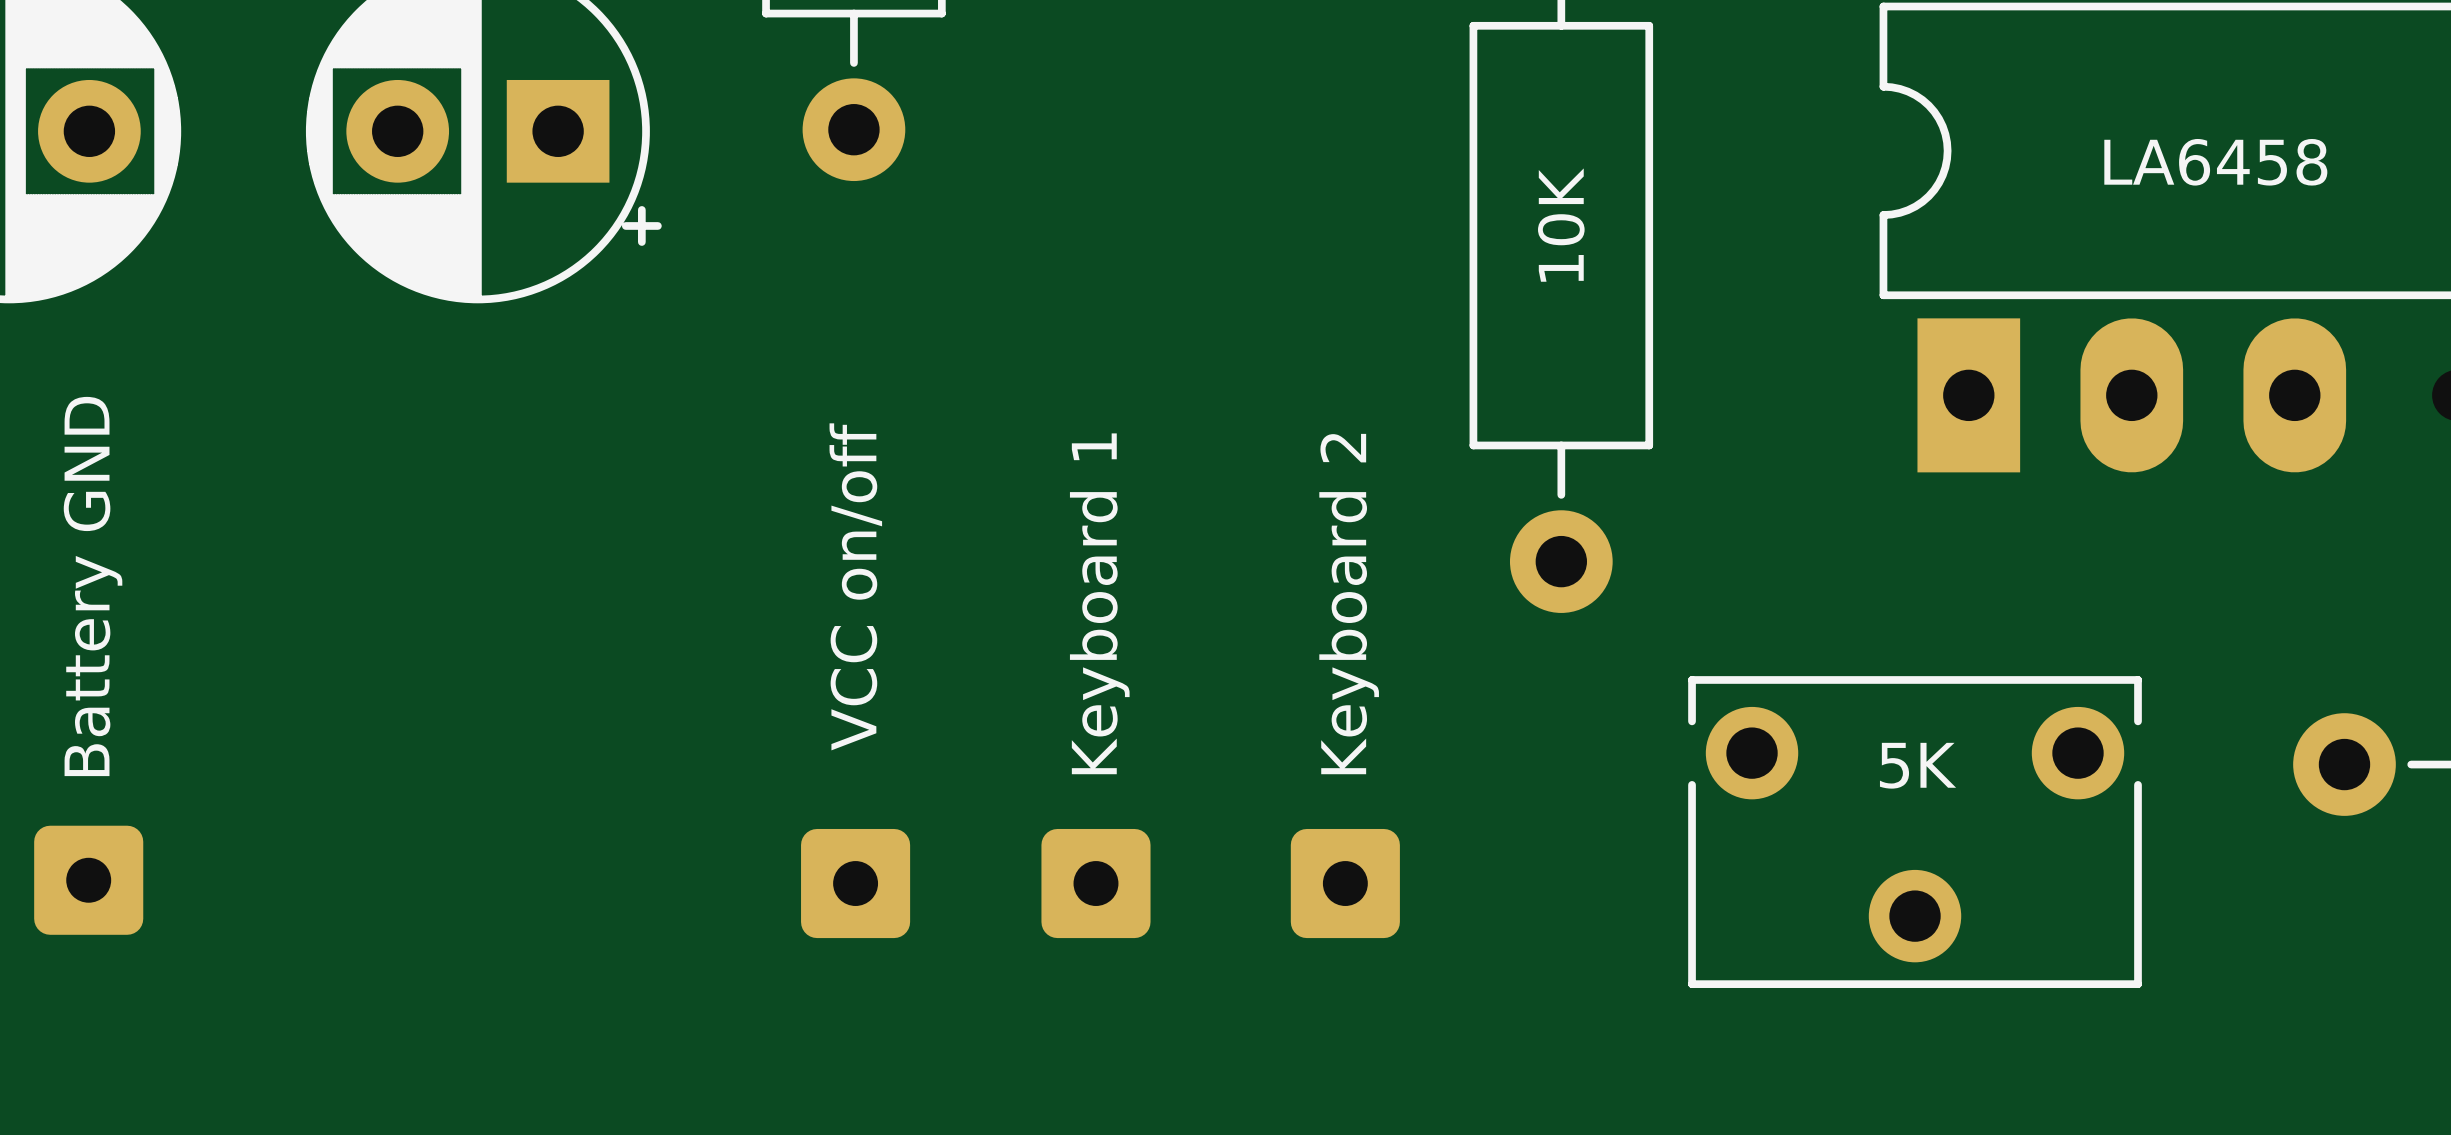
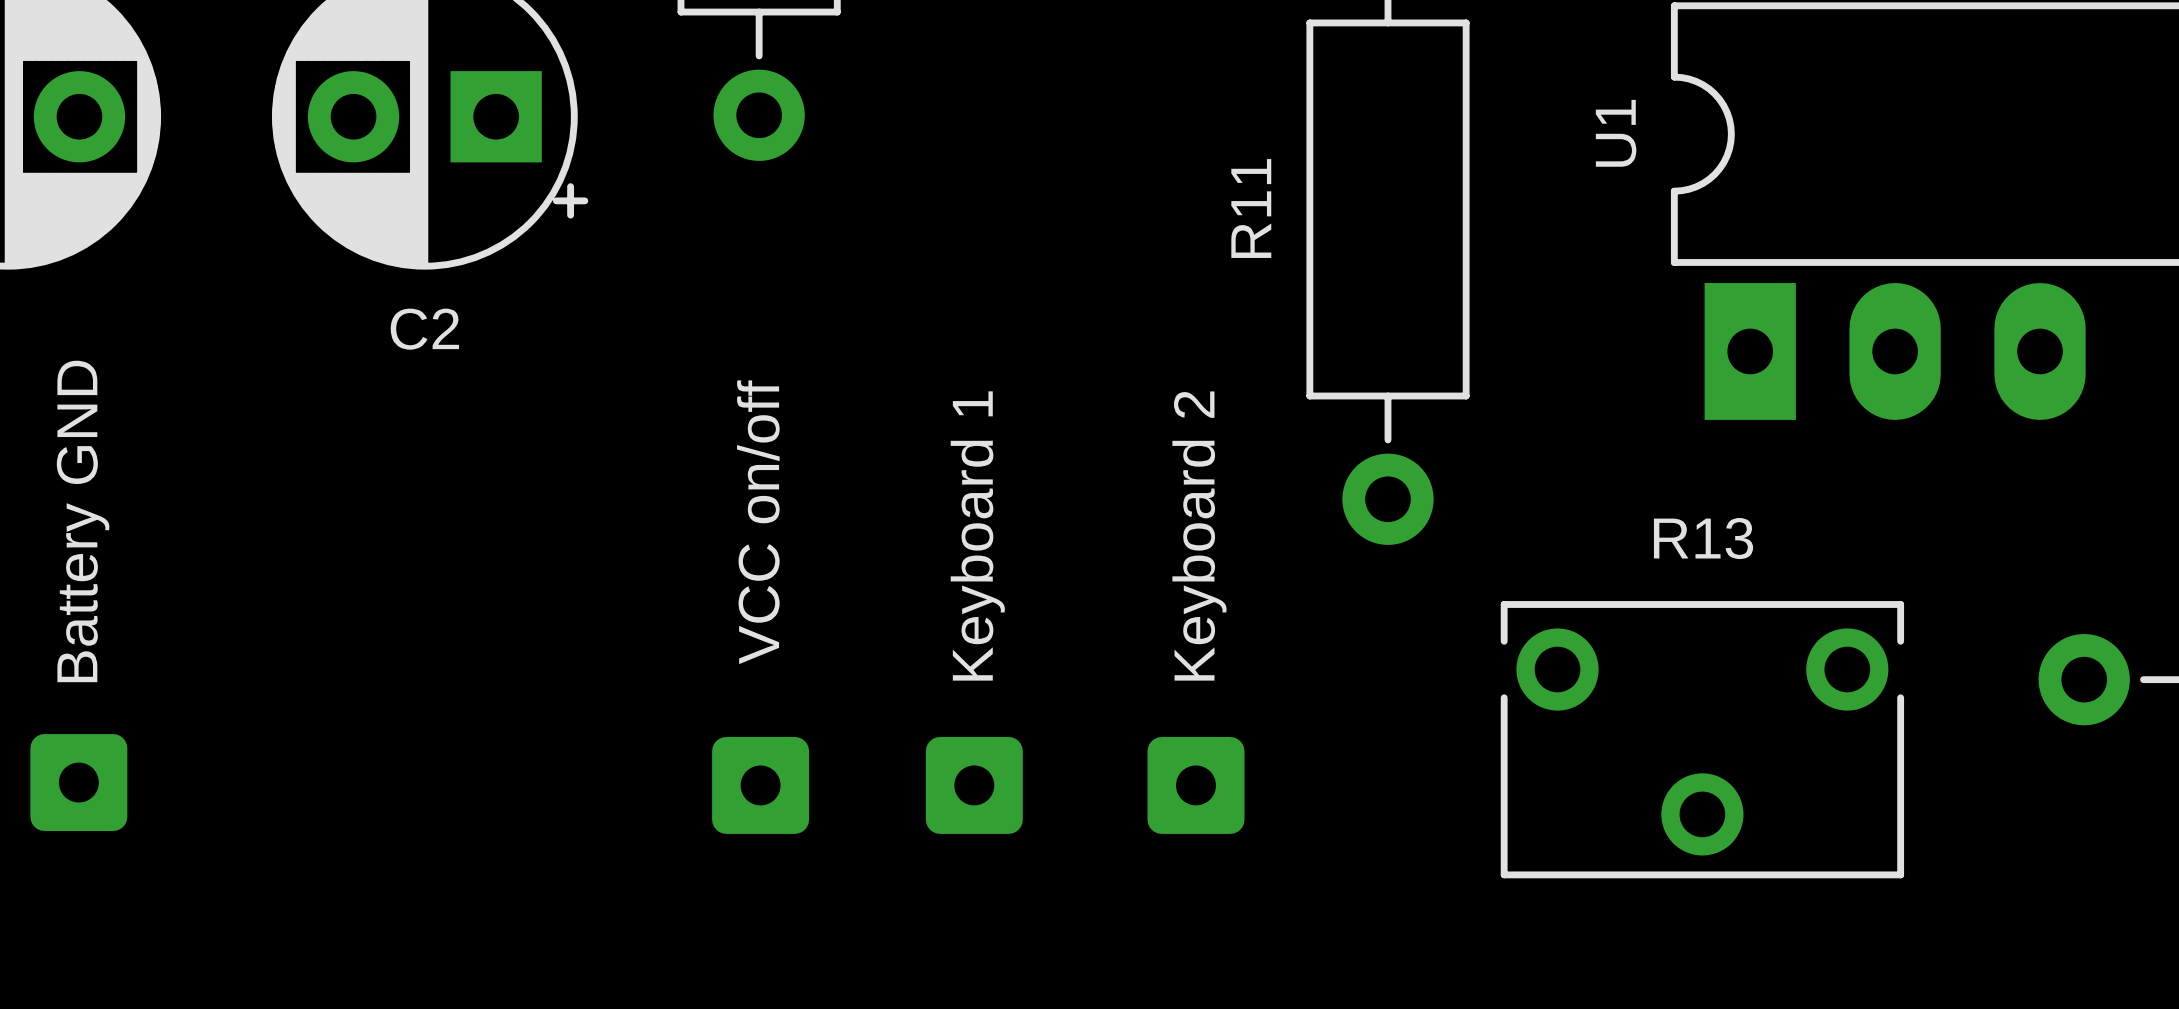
U1 name: none -> U1 (1616, 133)
U1 value: LA6458 (2215, 162) -> none
R11 value: 10K (1561, 225) -> none
R11 name: none -> R11 (1251, 208)
C2 name: none -> C2 (424, 329)
R13 name: none -> R13 (1703, 538)
R13 value: 5K (1918, 765) -> none

